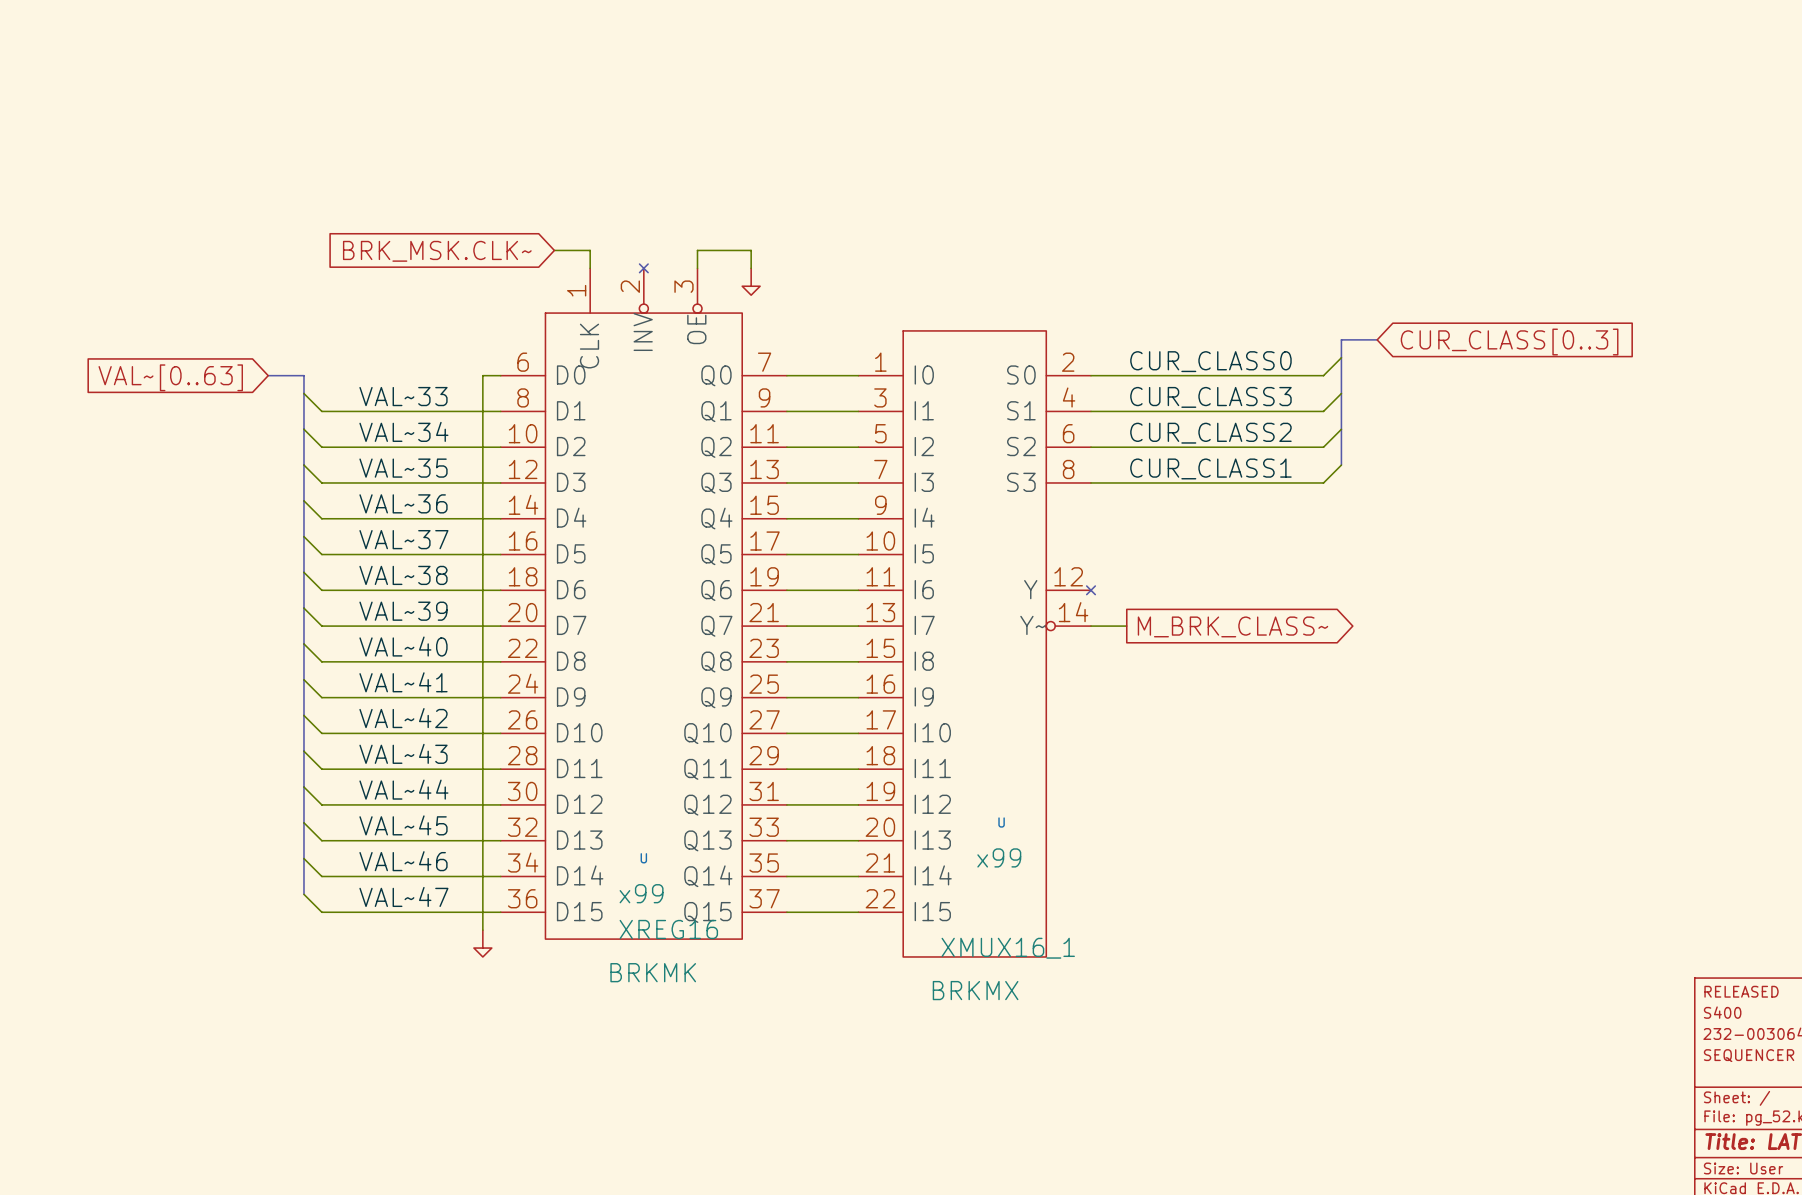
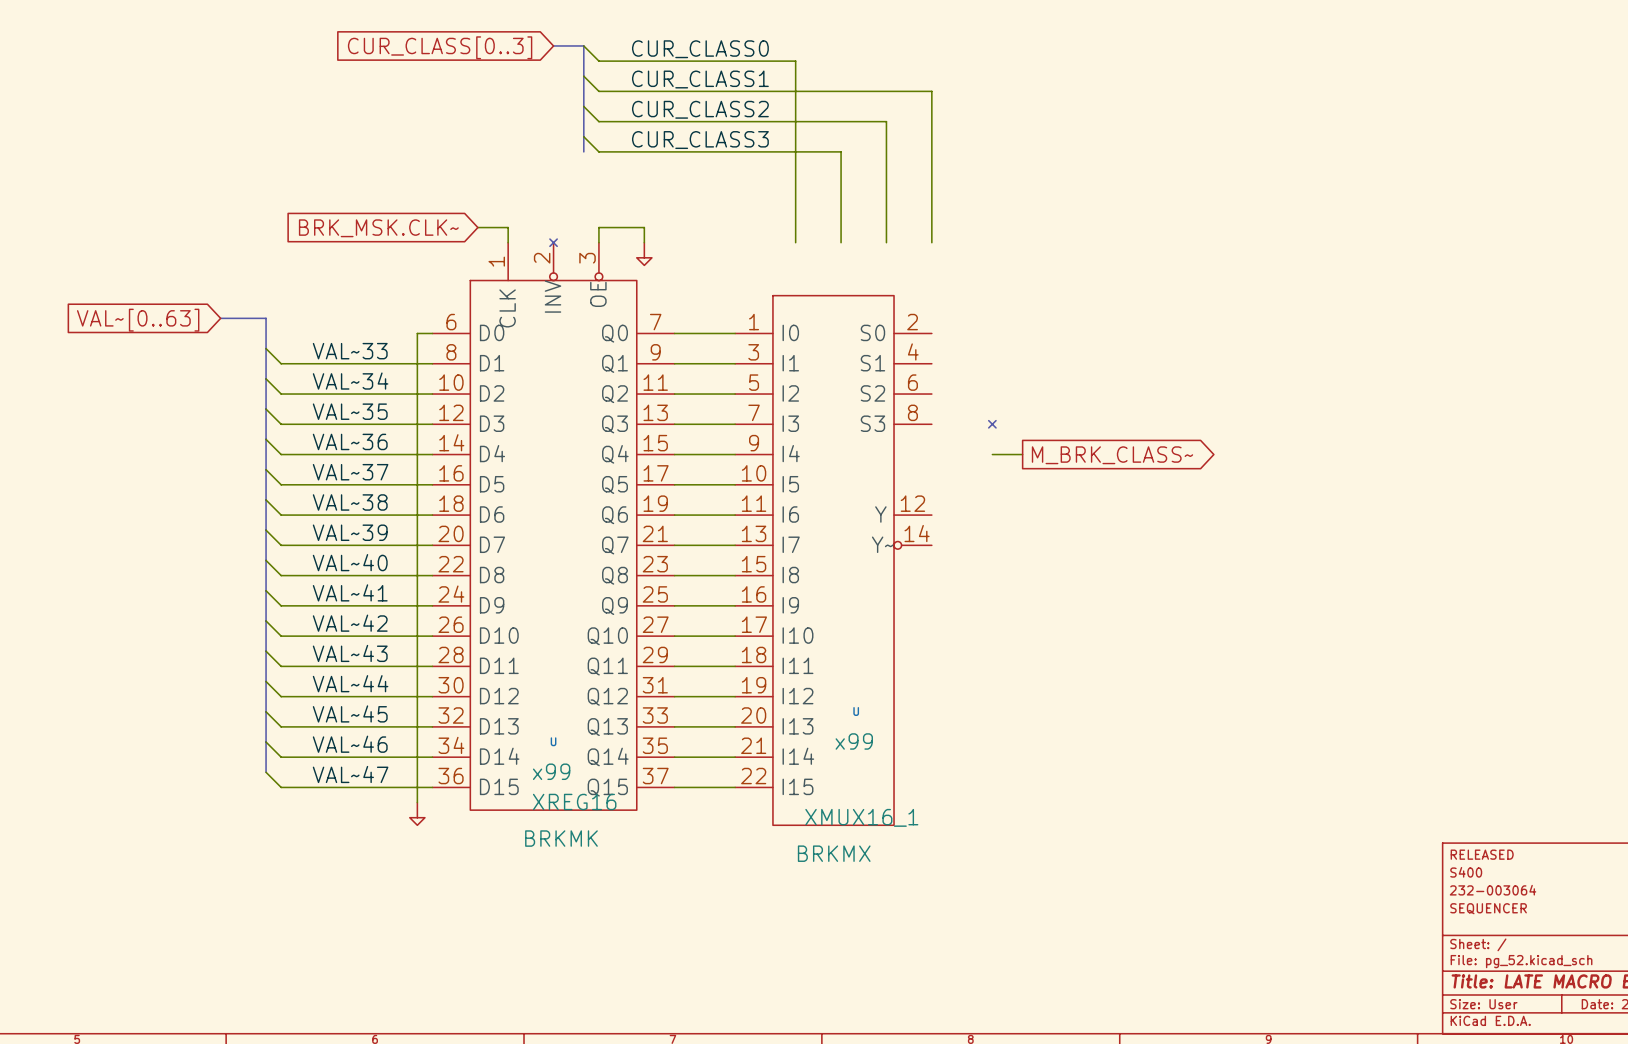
bus: none -> (553, 45) (583, 45) (583, 151)
wire: none -> (583, 45) (598, 61) (795, 61) (795, 242)
global label: none -> CUR_CLASS[0..3] (440, 47)
label: none -> CUR_CLASS0 (700, 49)
wire: none -> (583, 76) (598, 91) (931, 91) (931, 242)
label: none -> CUR_CLASS1 (700, 79)
wire: none -> (583, 106) (598, 121) (886, 121) (886, 242)
label: none -> CUR_CLASS2 (700, 109)
wire: none -> (583, 136) (598, 151) (841, 151) (841, 242)
label: none -> CUR_CLASS3 (700, 140)
bus: (1377, 339) (1341, 339) (1341, 465) -> none
global label: CUR_CLASS[0..3] (1509, 342) -> none
wire: (1341, 357) (1323, 375) (1091, 375) -> none
label: CUR_CLASS0 (1210, 361) -> none
bus: (268, 375) (303, 375) -> (220, 318) (266, 318) (266, 333)
global label position: VAL~[0..63] (170, 377) -> VAL~[0..63] (138, 320)
wire: (1341, 393) (1323, 411) (1091, 411) -> none
label: CUR_CLASS3 (1210, 397) -> none
wire: (1341, 429) (1323, 447) (1091, 447) -> none
label: CUR_CLASS2 (1210, 433) -> none
wire: (1341, 465) (1323, 482) (1091, 482) -> none
label: CUR_CLASS1 (1210, 468) -> none
no-connect mark: none -> (992, 424)
no-connect mark: (1091, 590) -> none
wire: (1091, 626) (1126, 626) -> (992, 454) (1022, 454)
global label position: M_BRK_CLASS~ (1232, 626) -> M_BRK_CLASS~ (1112, 455)

